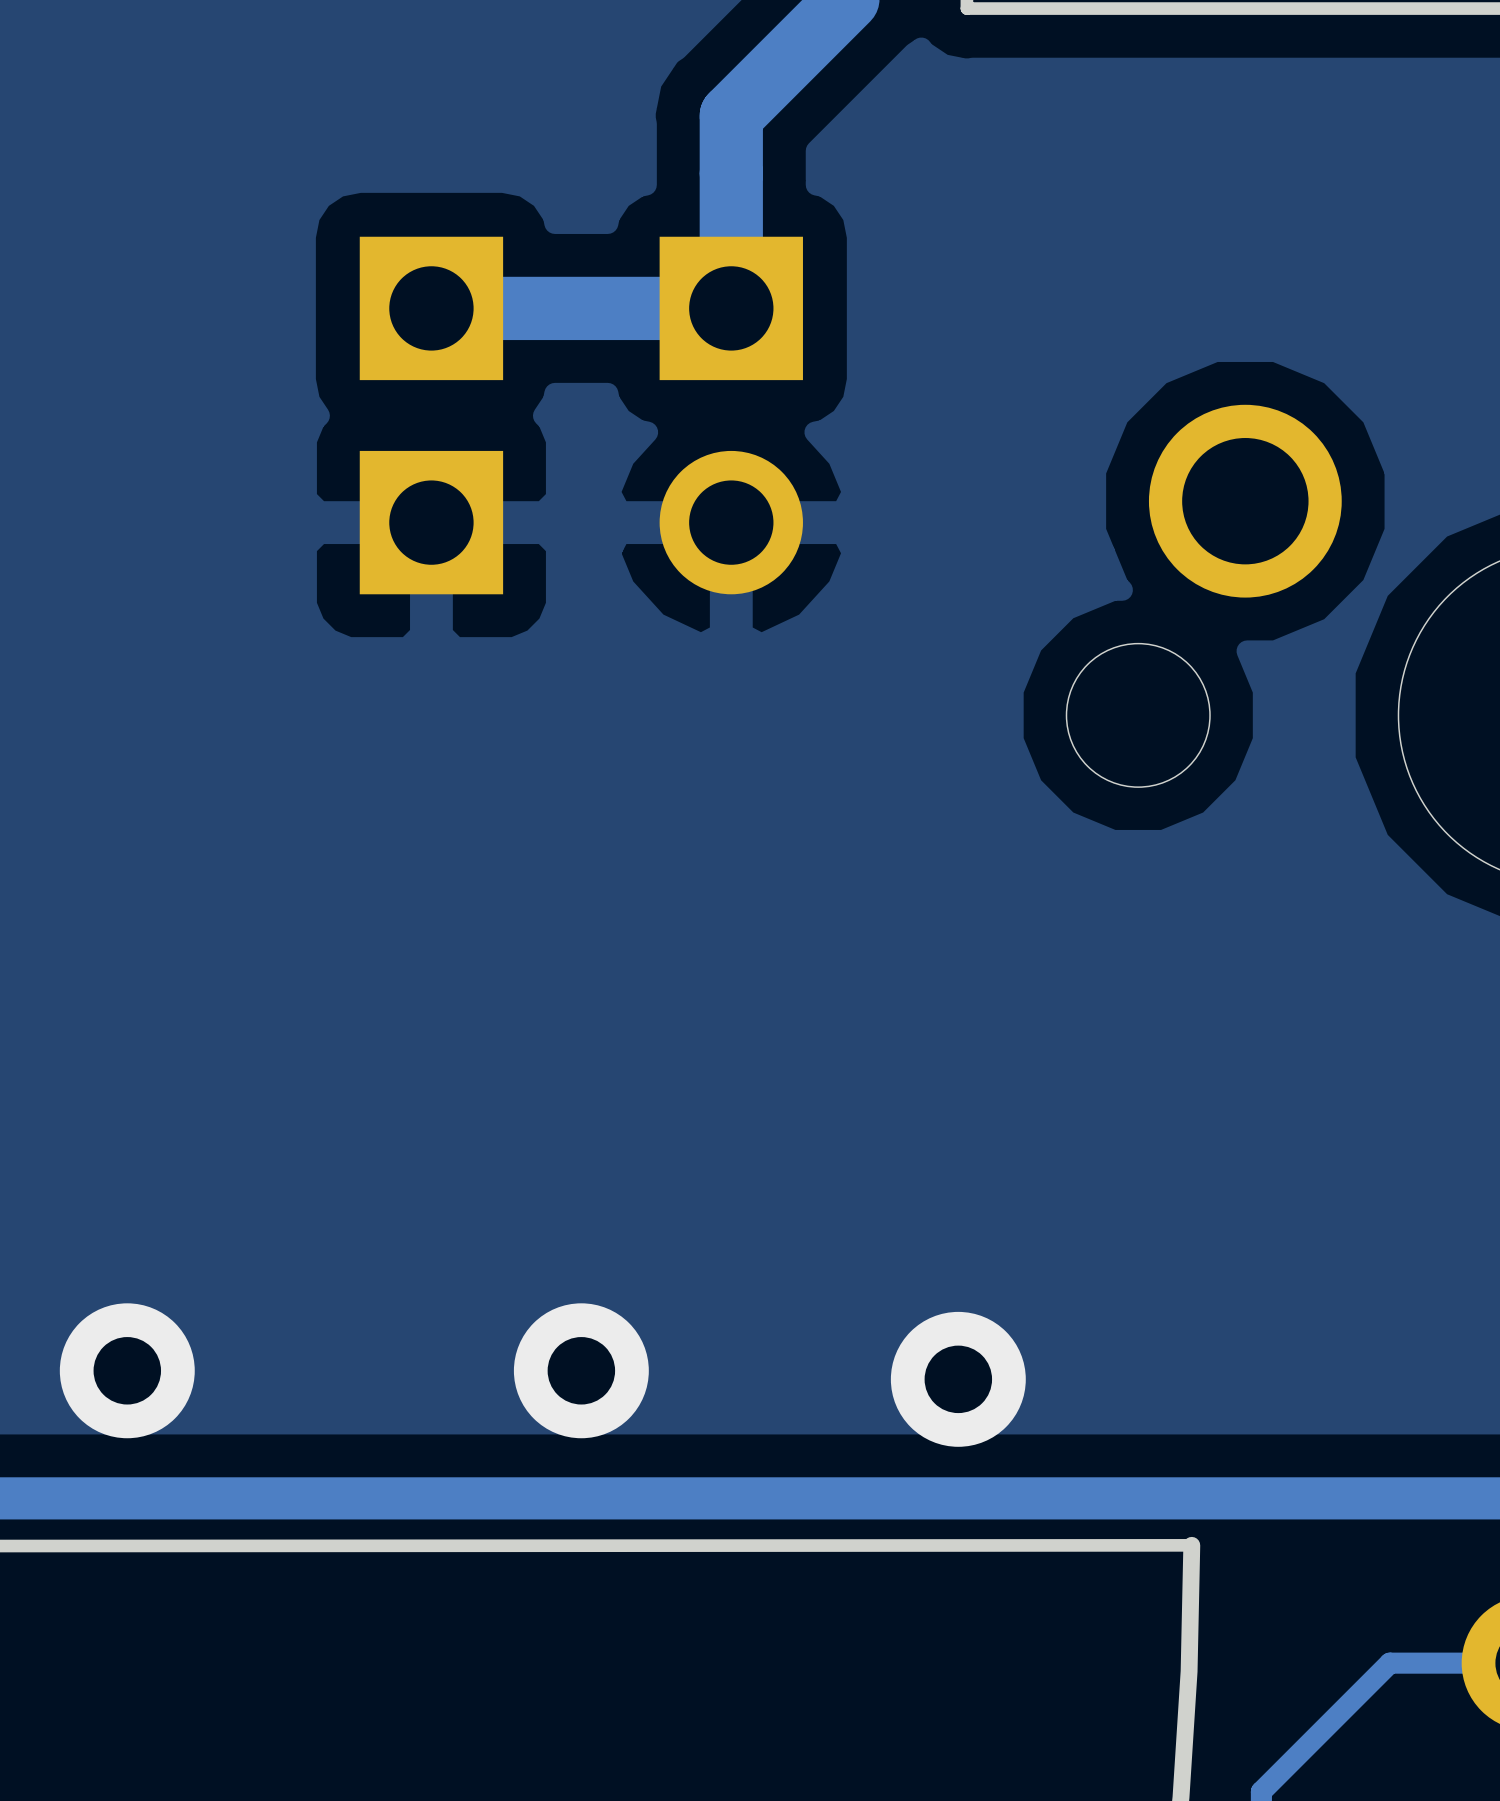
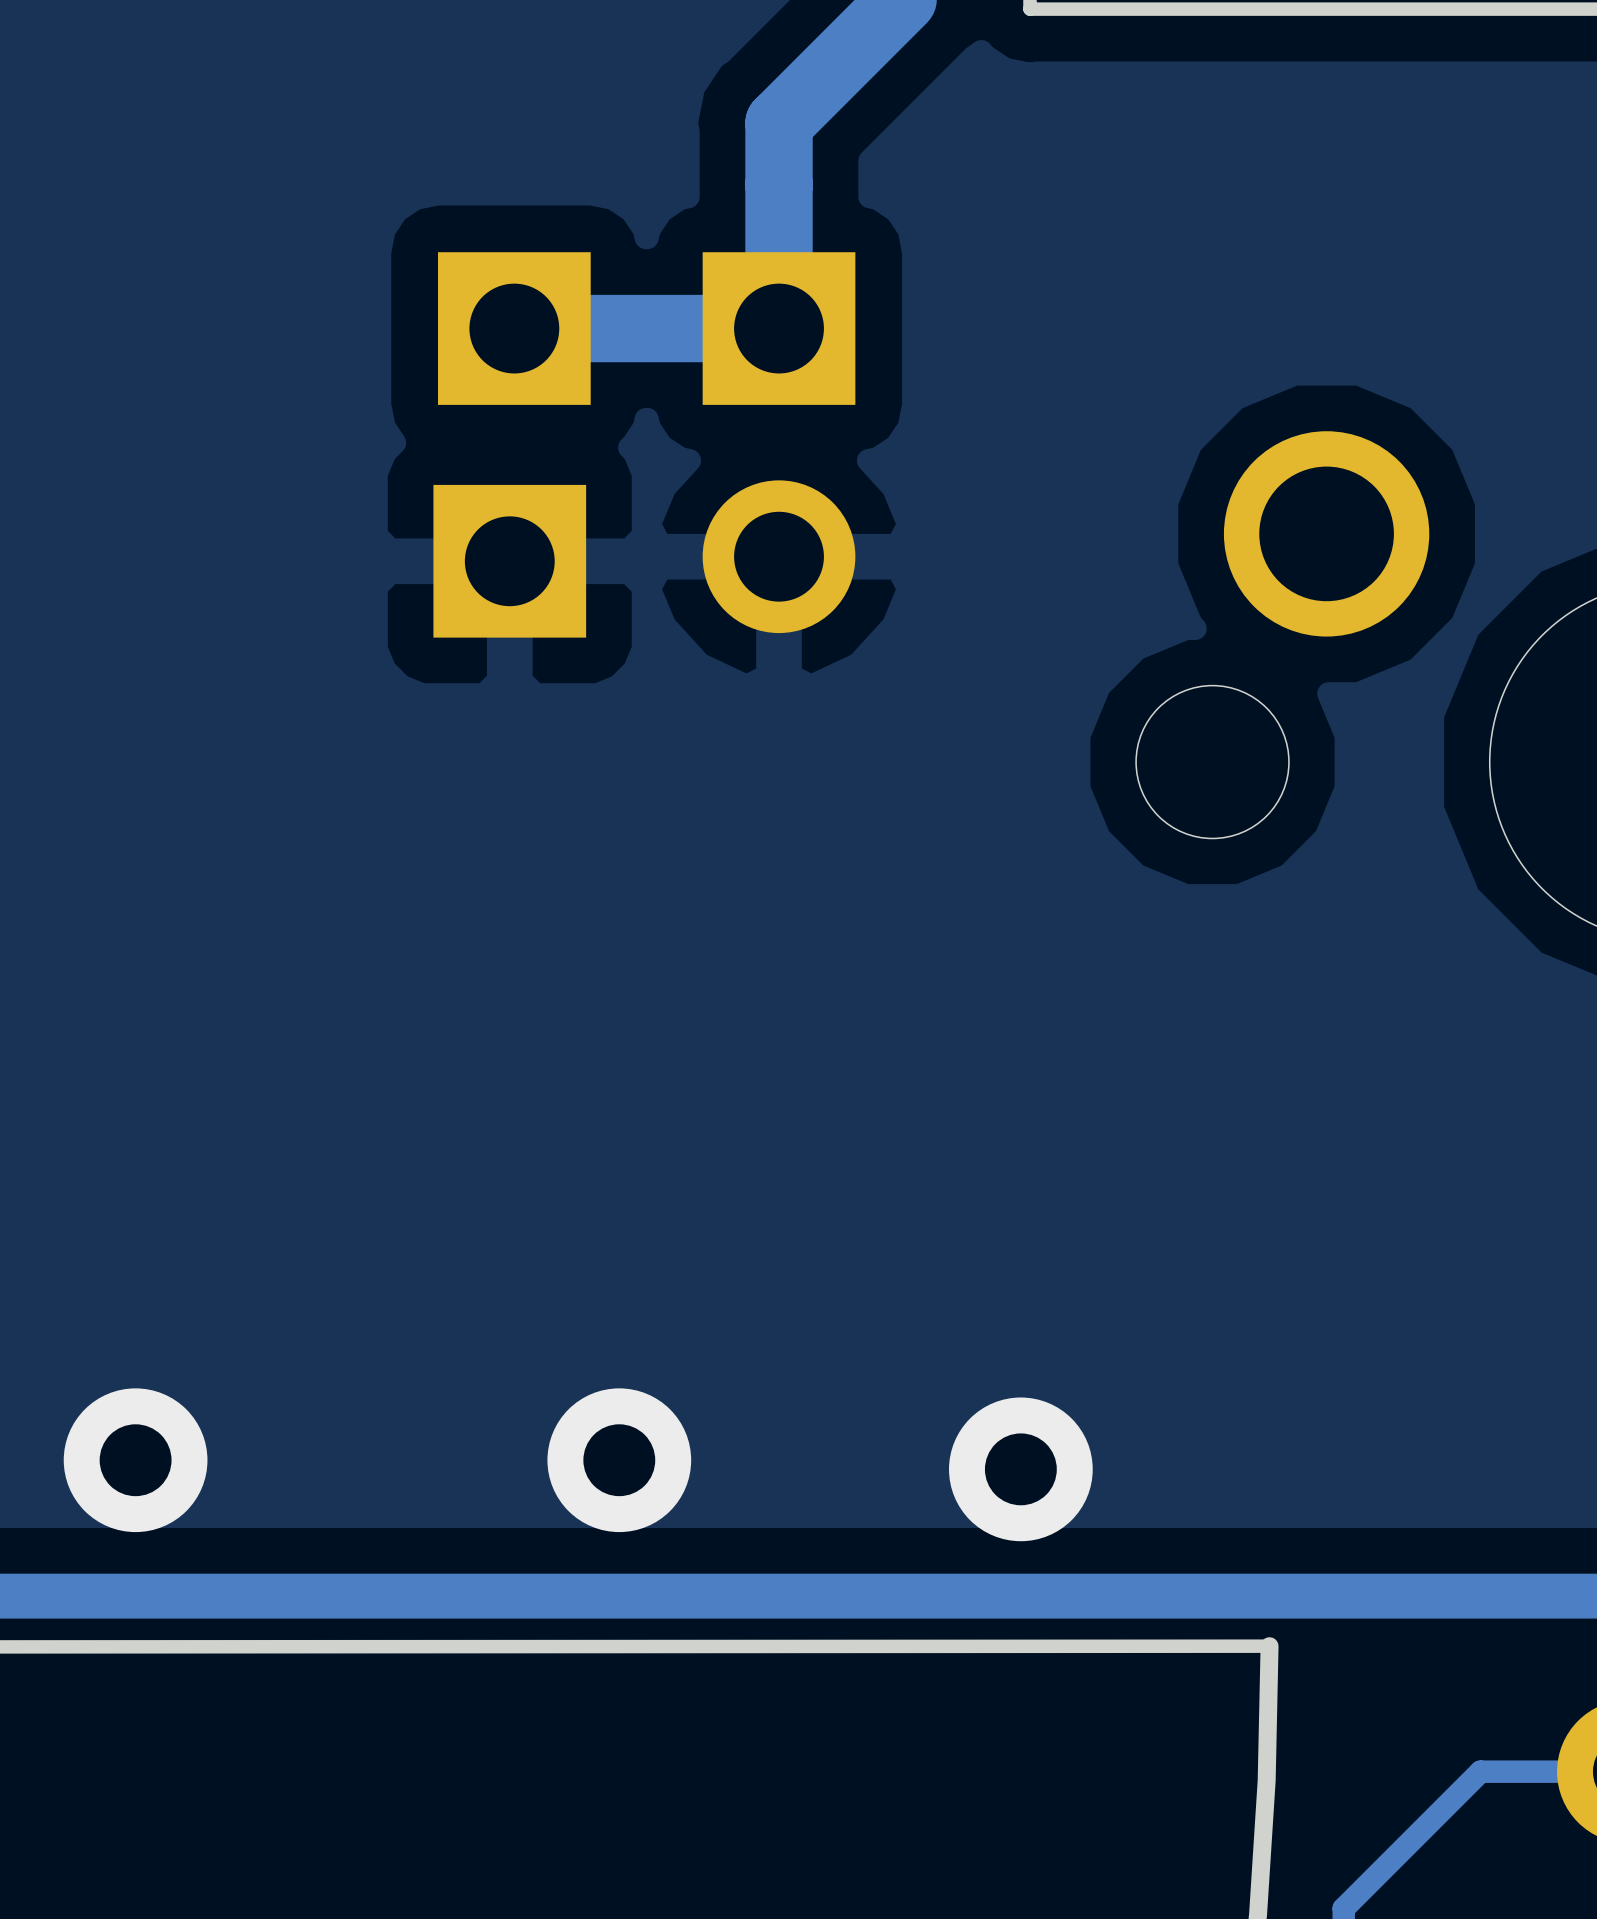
part position: (431, 308) -> (514, 328)
part position: (431, 522) -> (509, 561)

